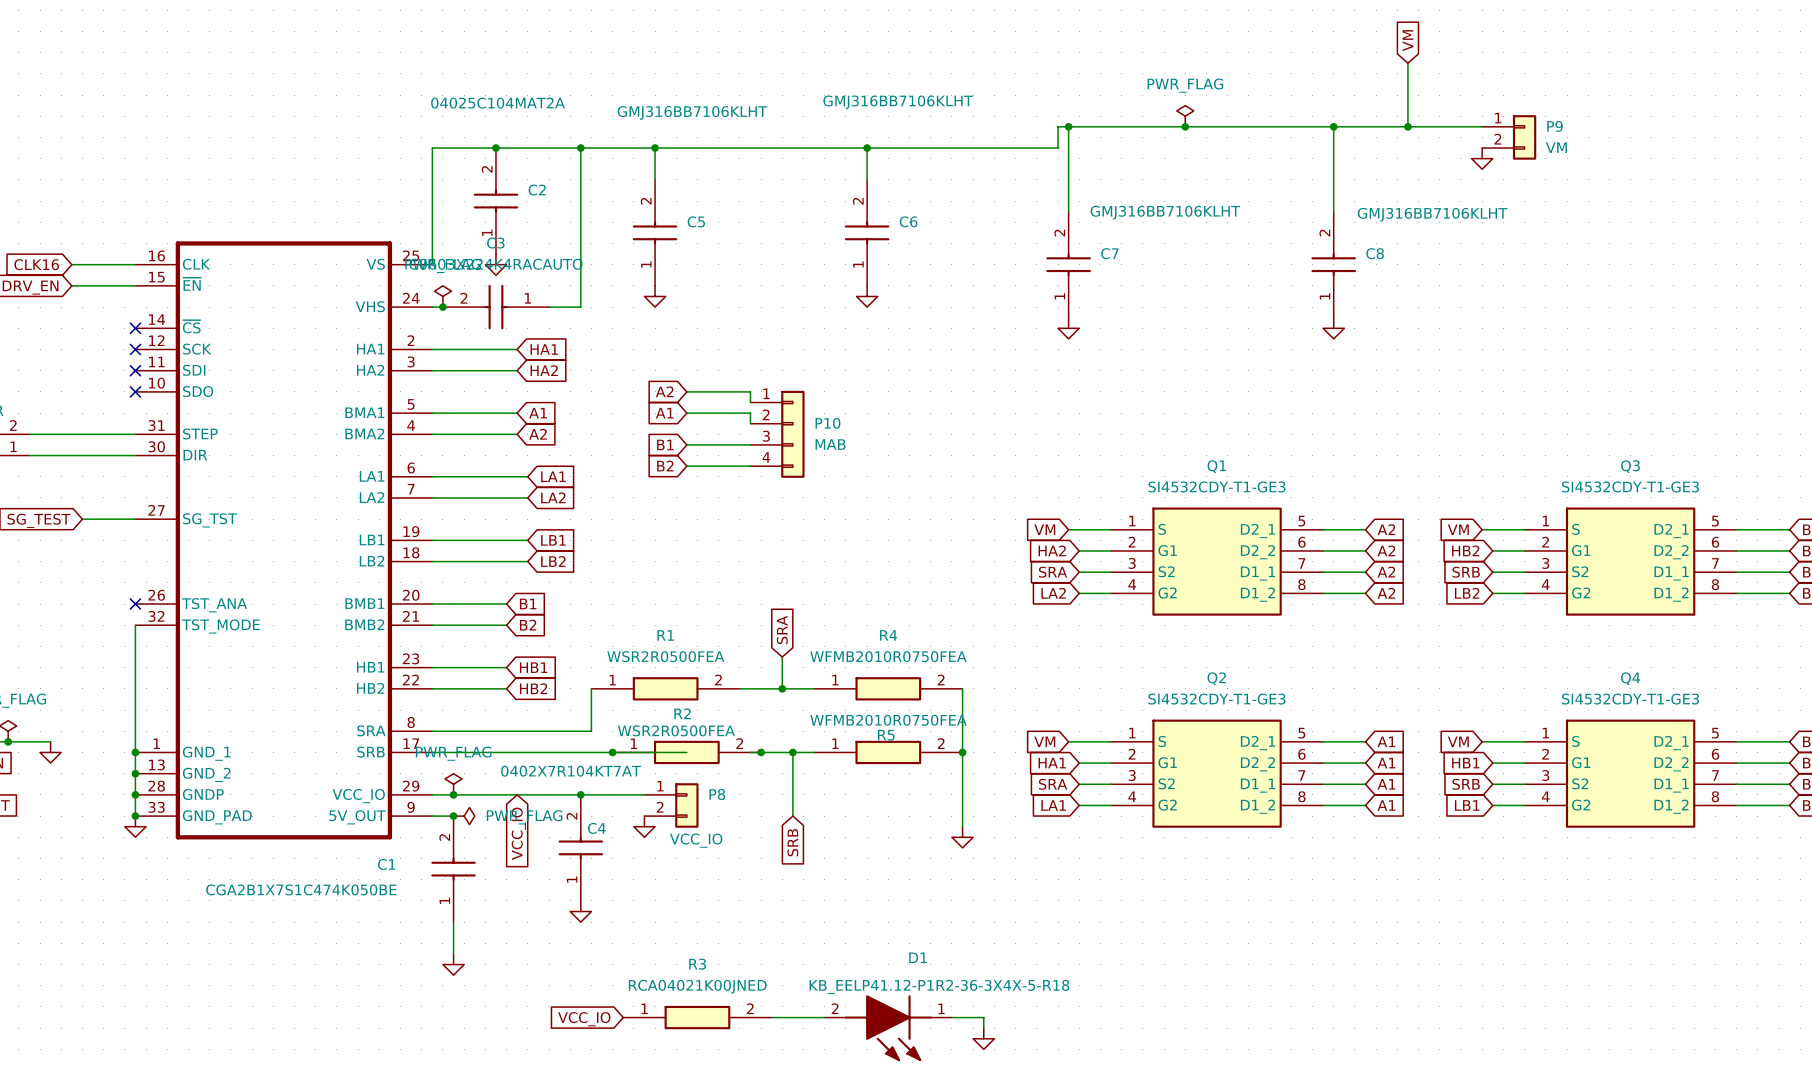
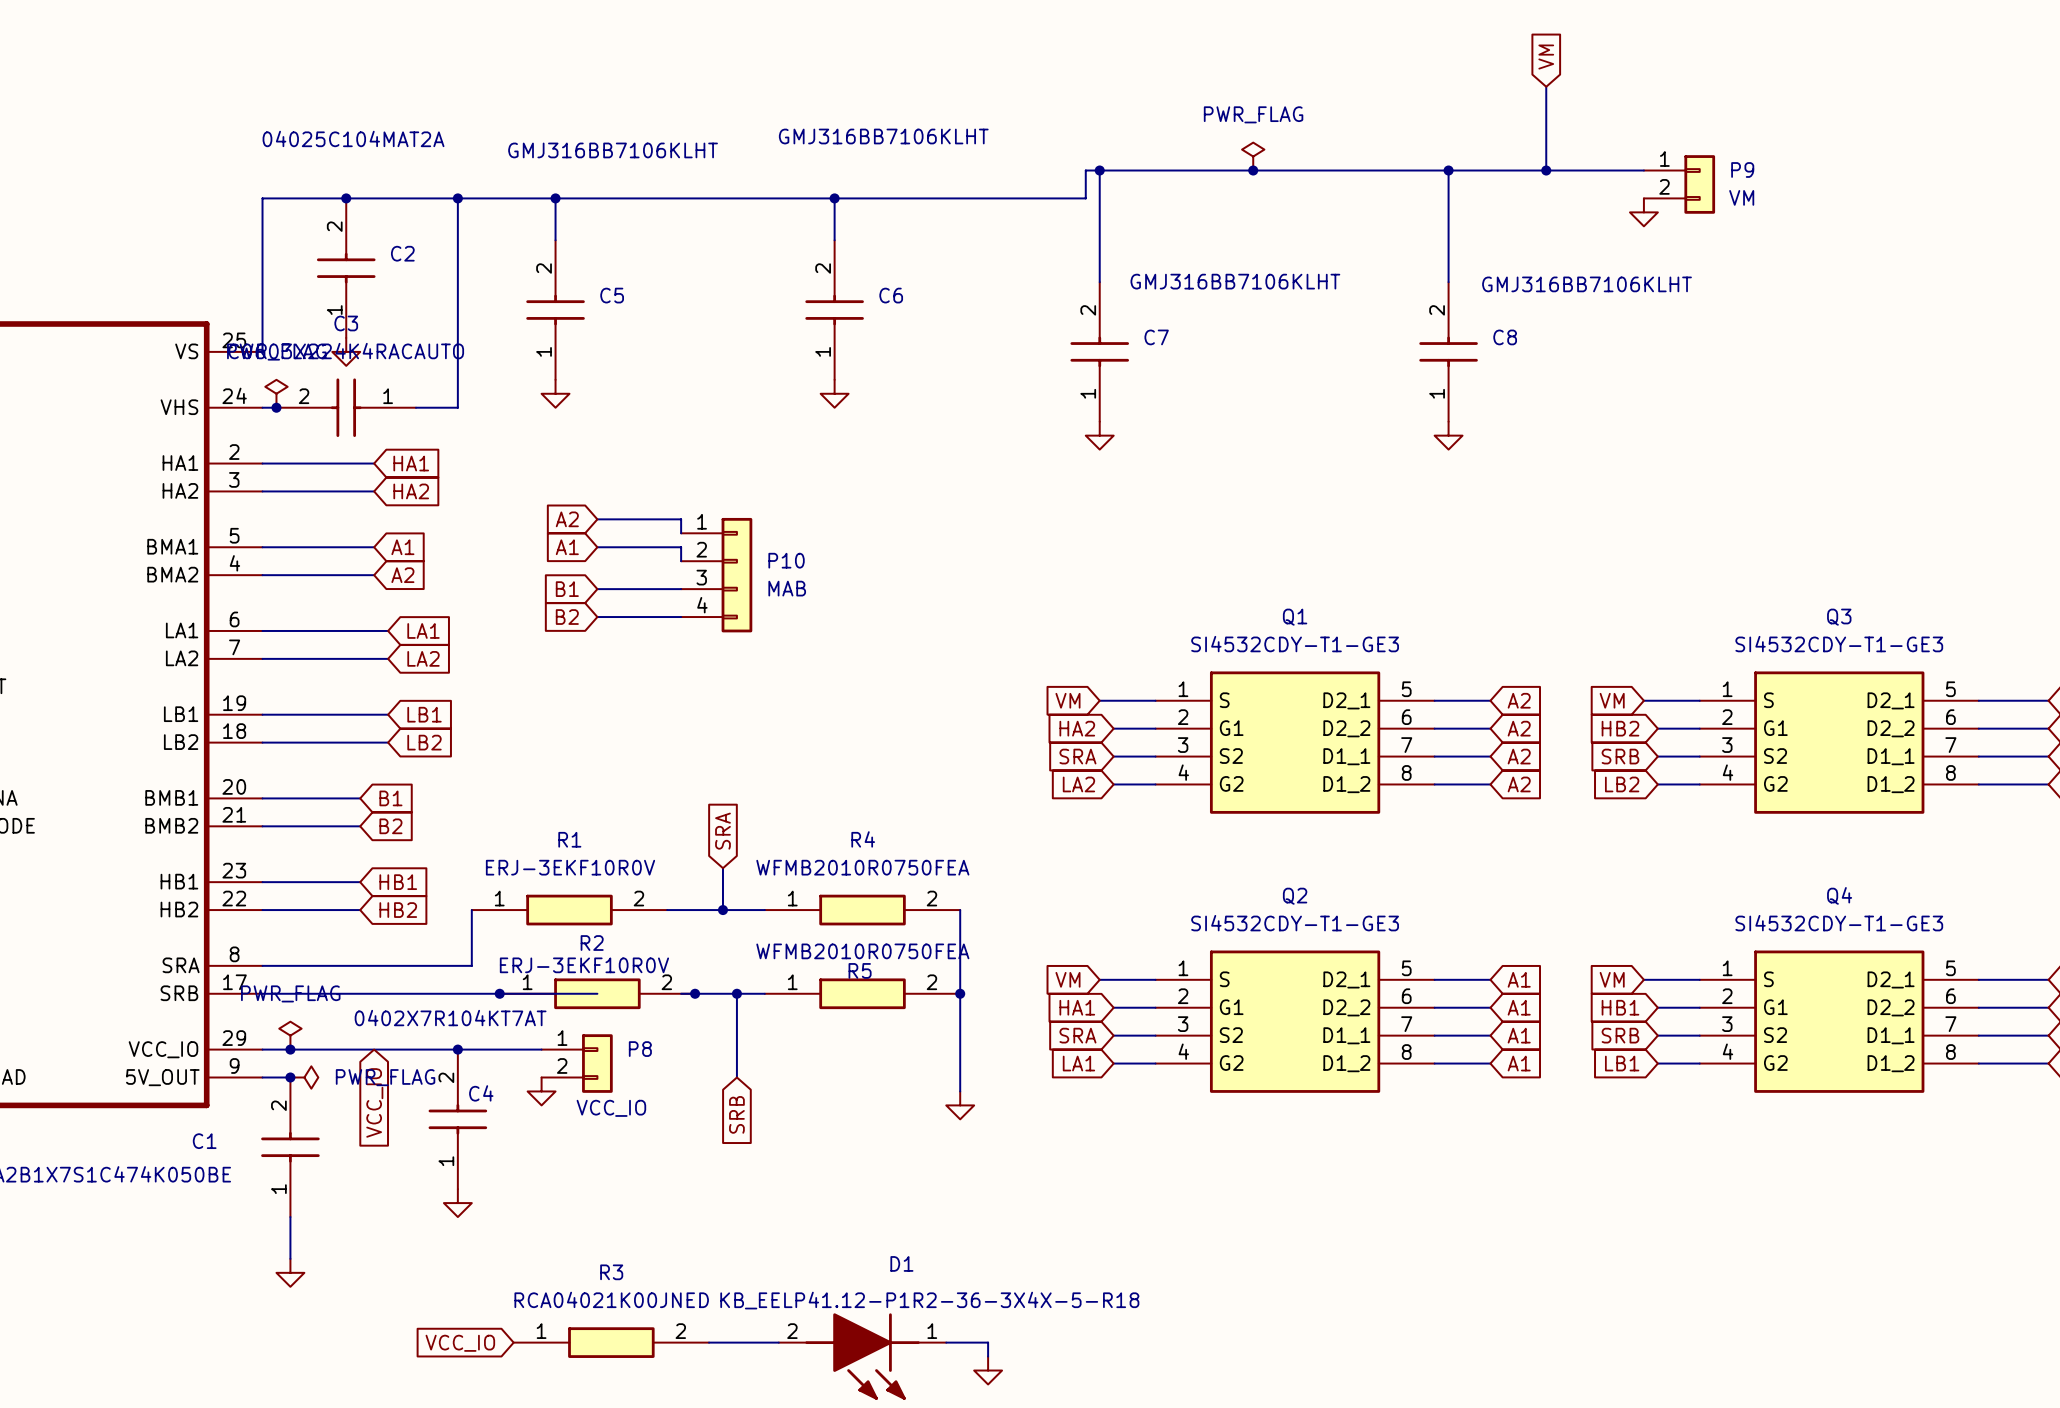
R1 value: WSR2R0500FEA (665, 656) -> ERJ-3EKF10R0V (570, 867)
R2 value: WSR2R0500FEA (676, 730) -> ERJ-3EKF10R0V (584, 965)

